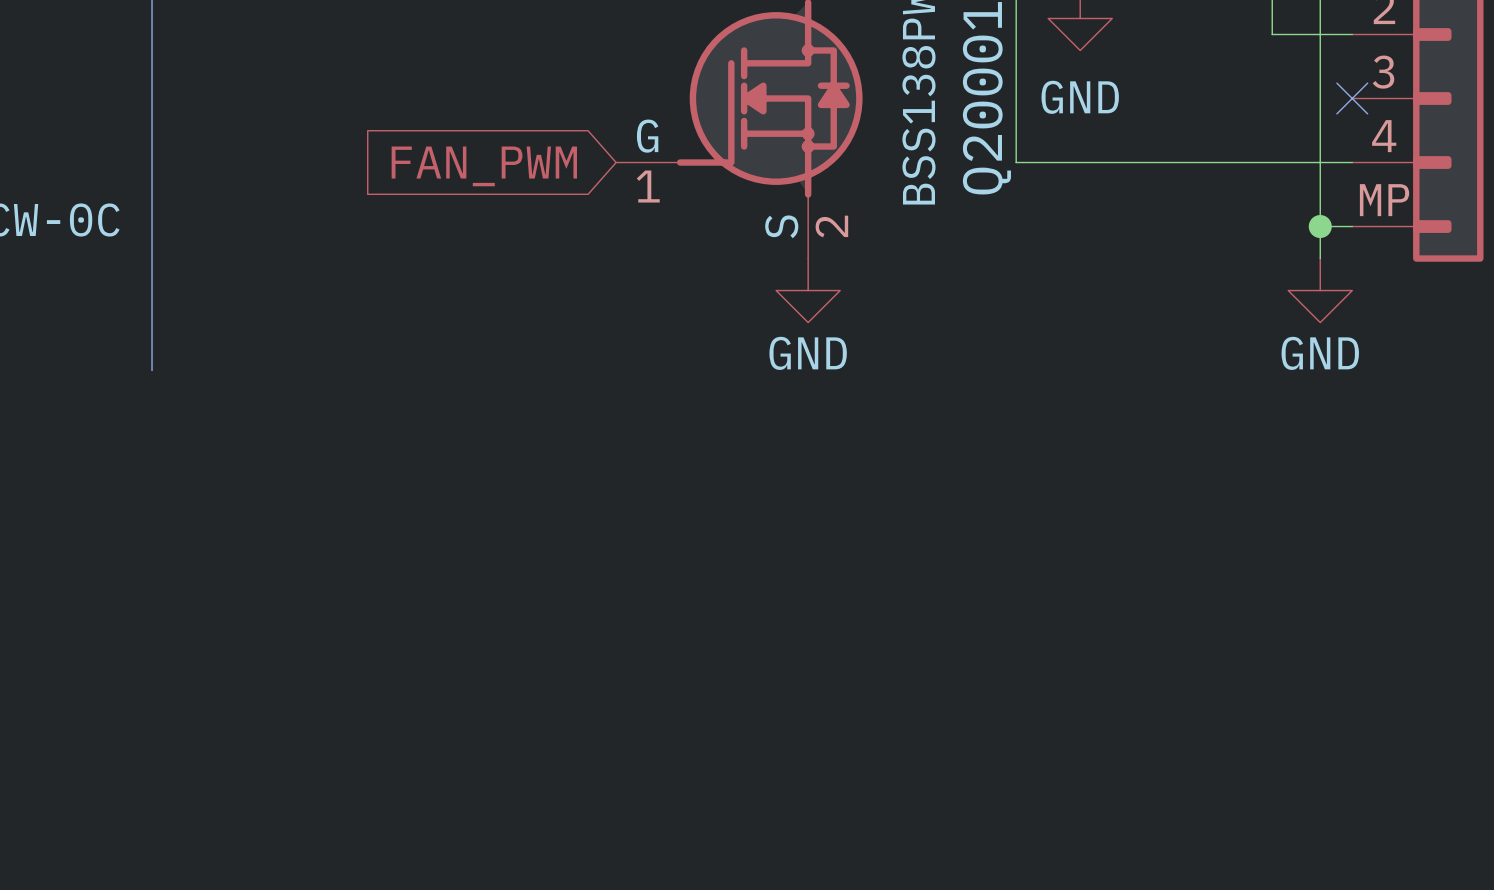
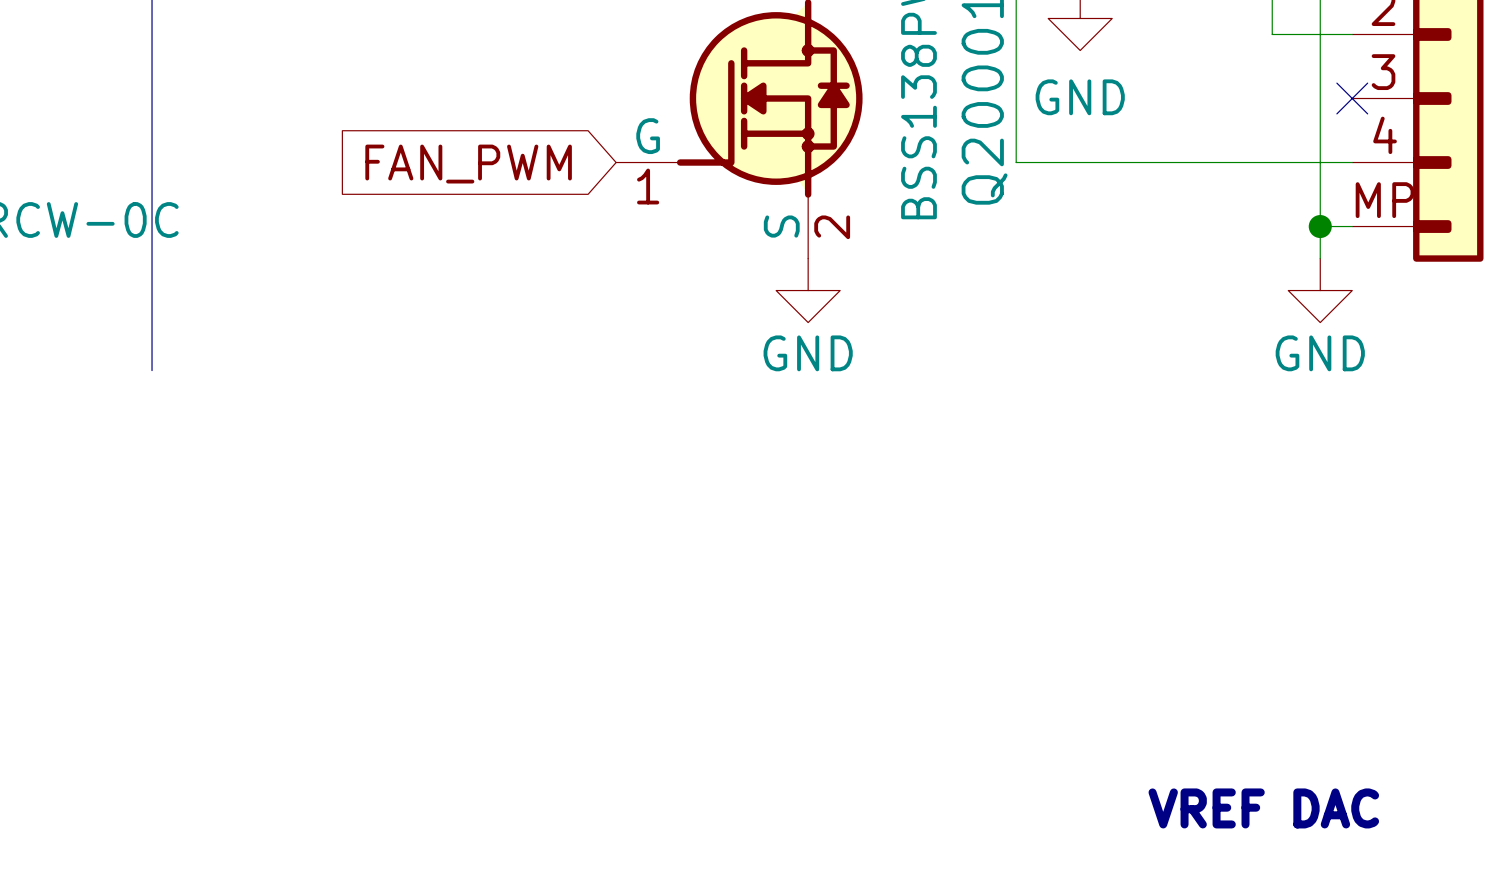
text: none -> VREF DAC (1263, 808)

